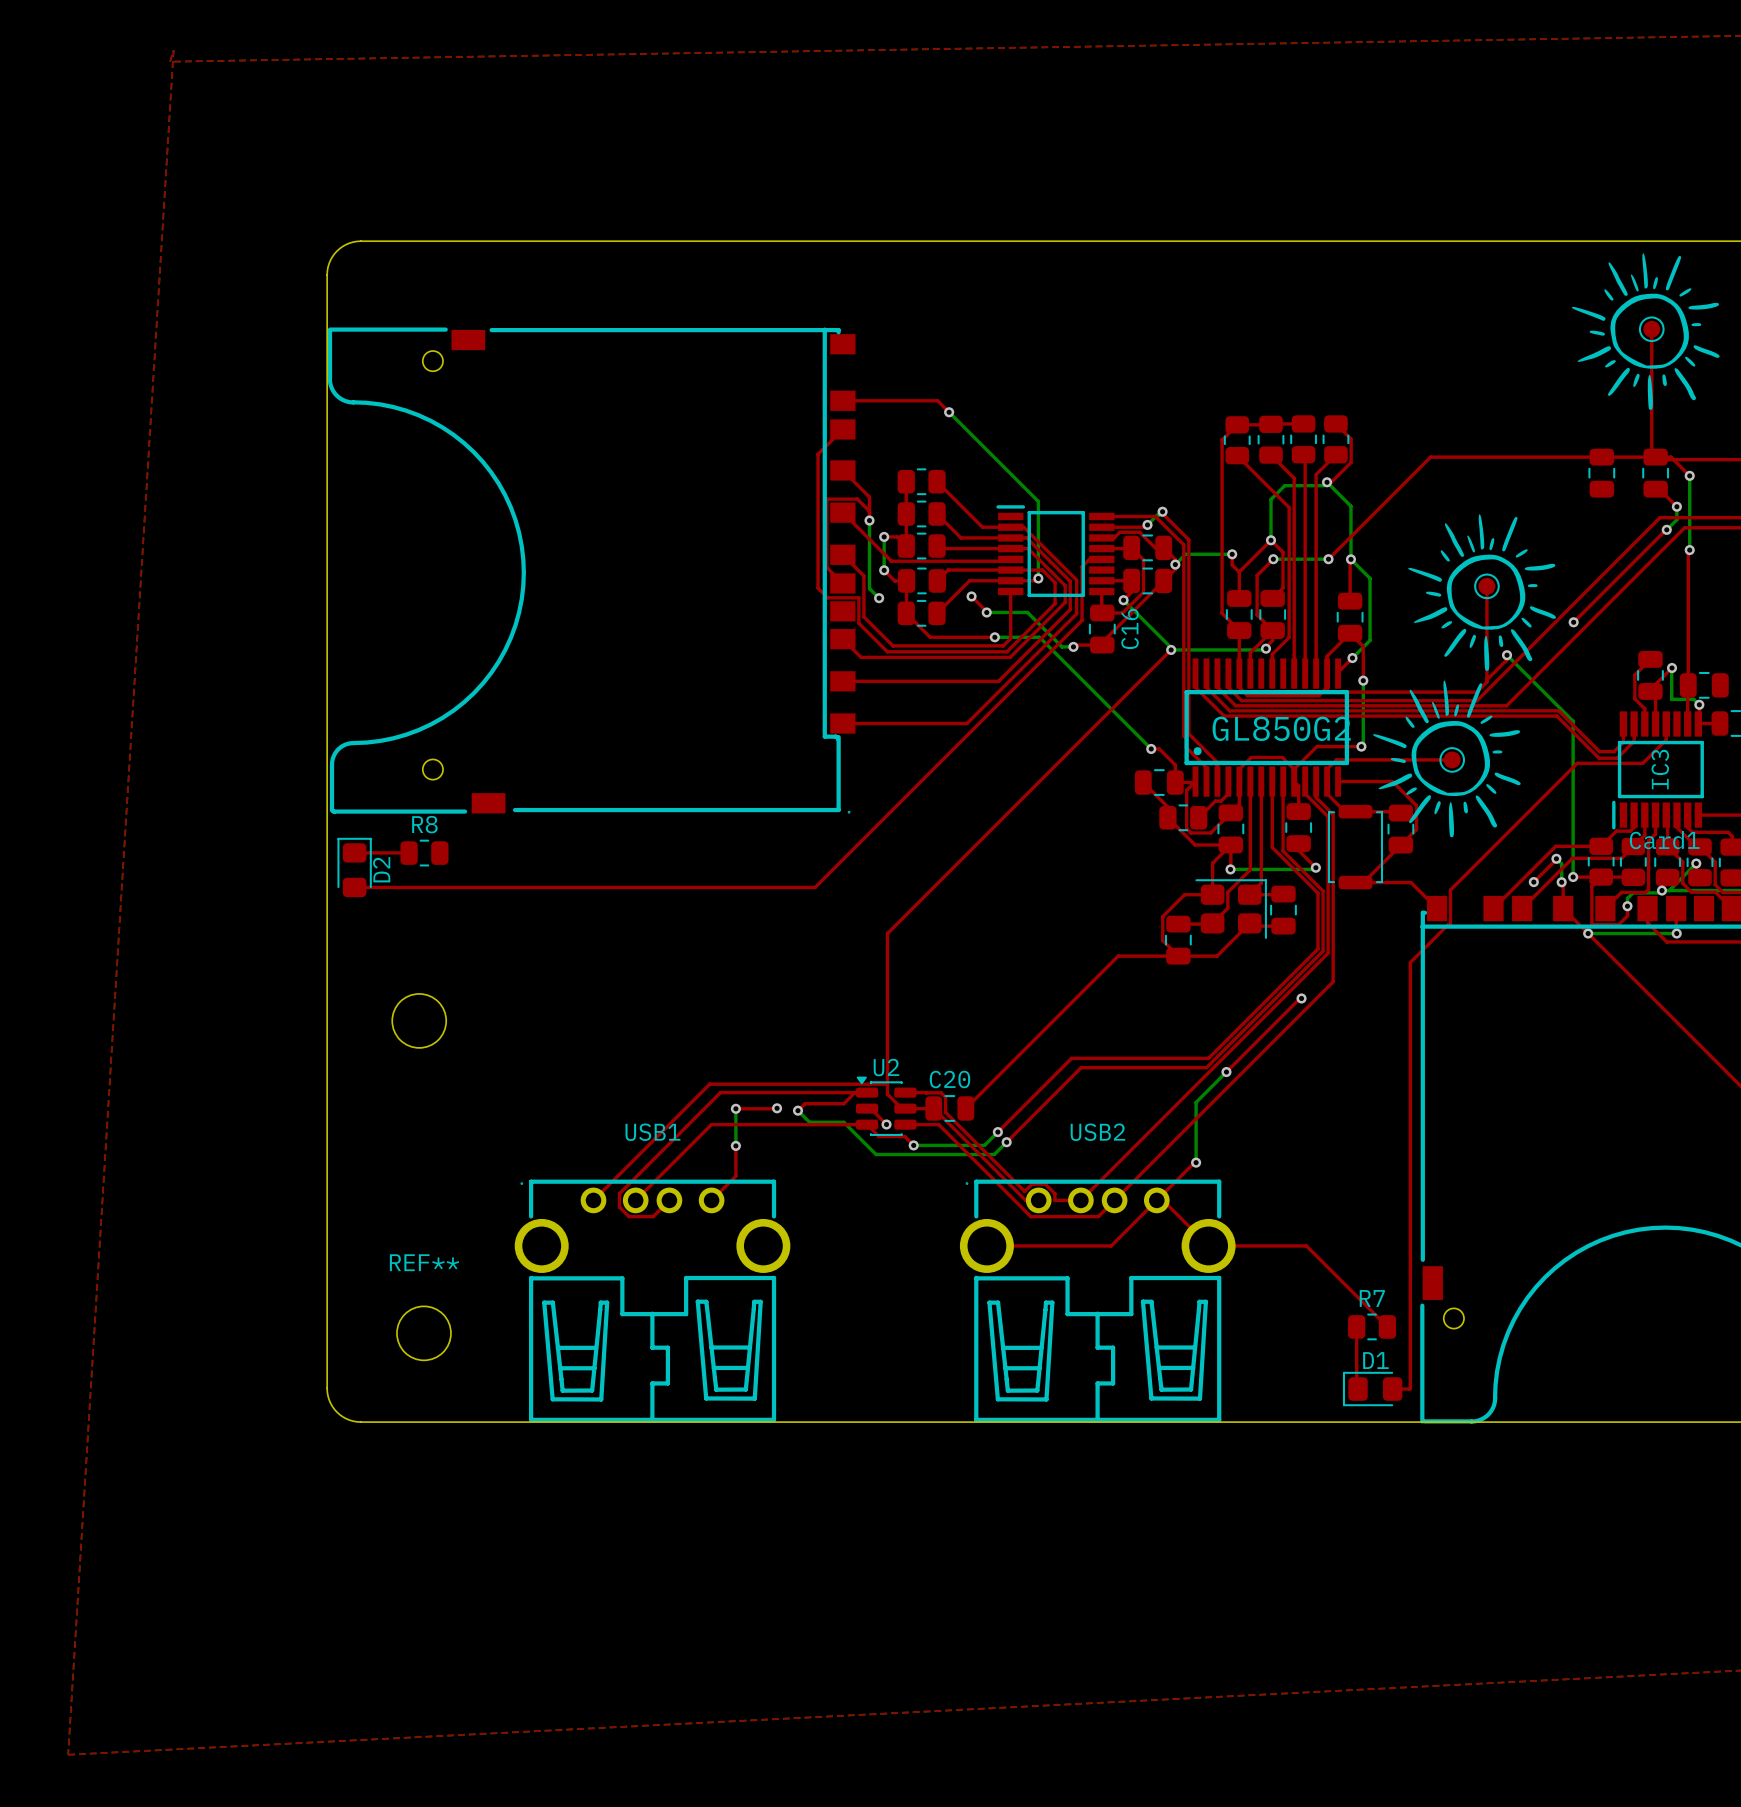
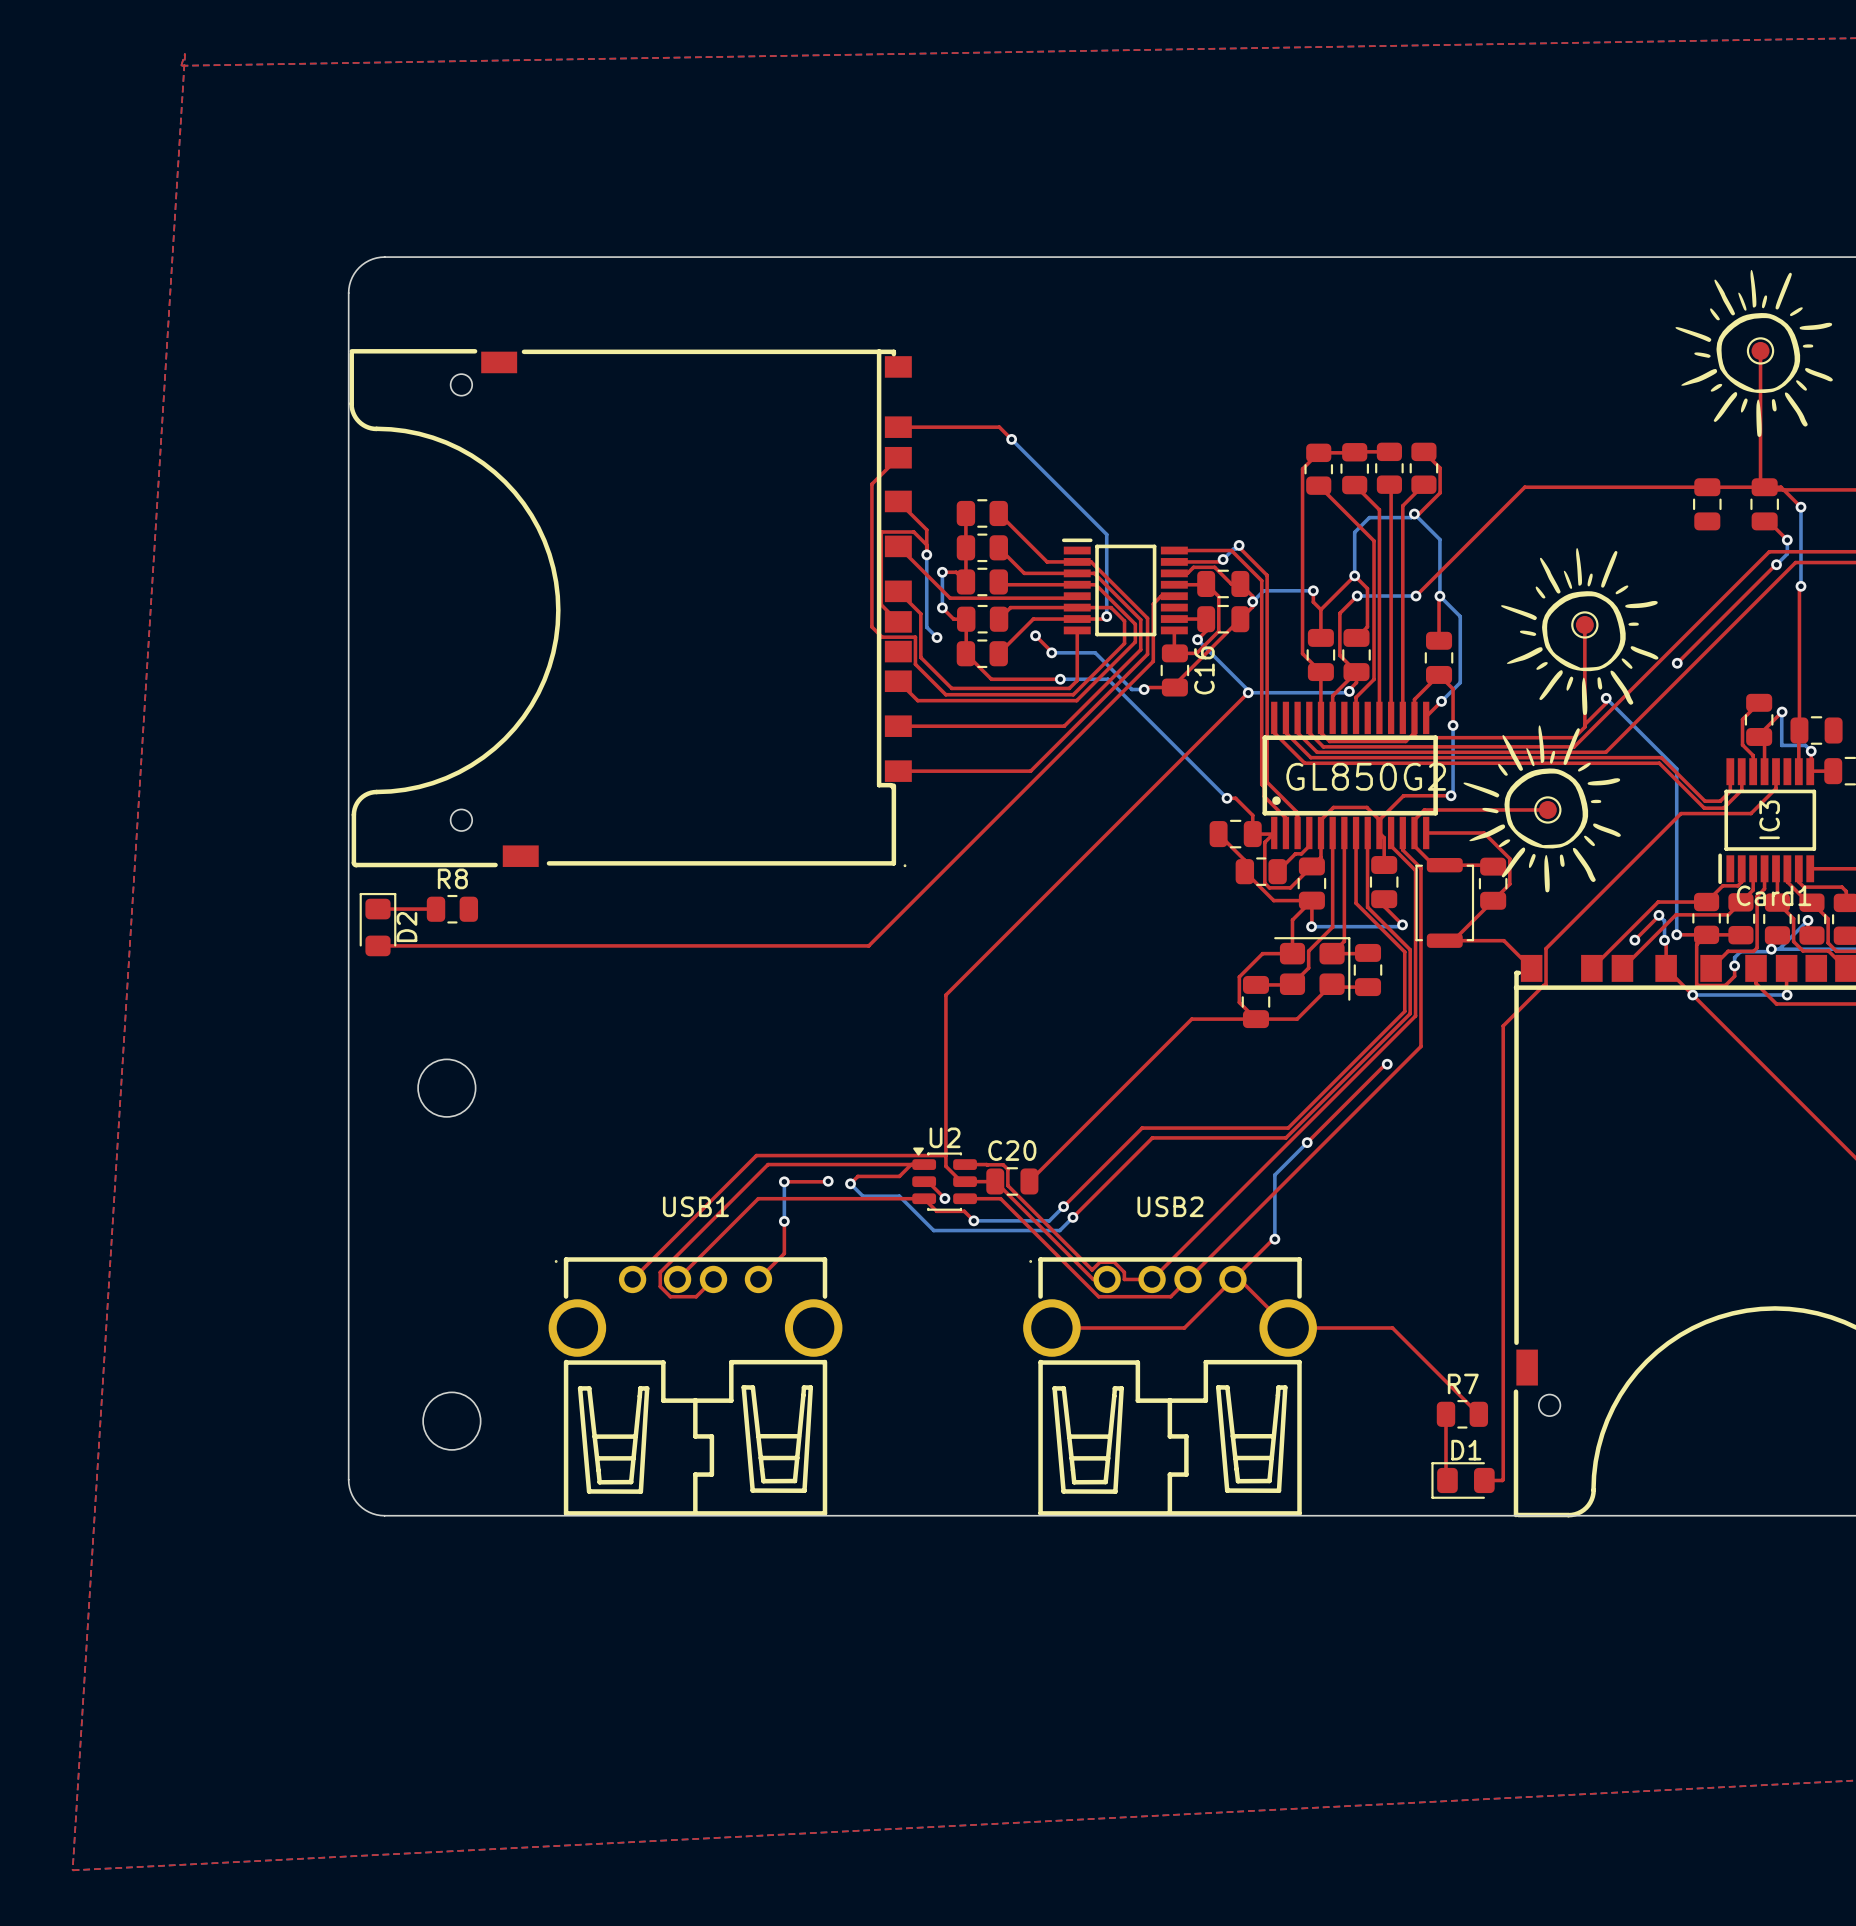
REF** name: REF** (424, 1262) -> none

